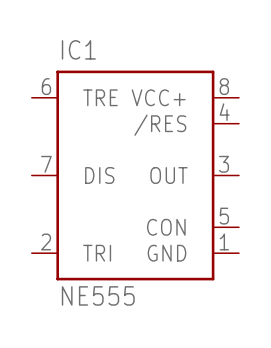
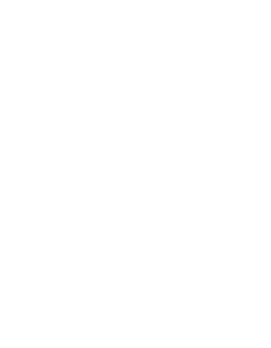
IC1: NE555 (135, 175) -> none

